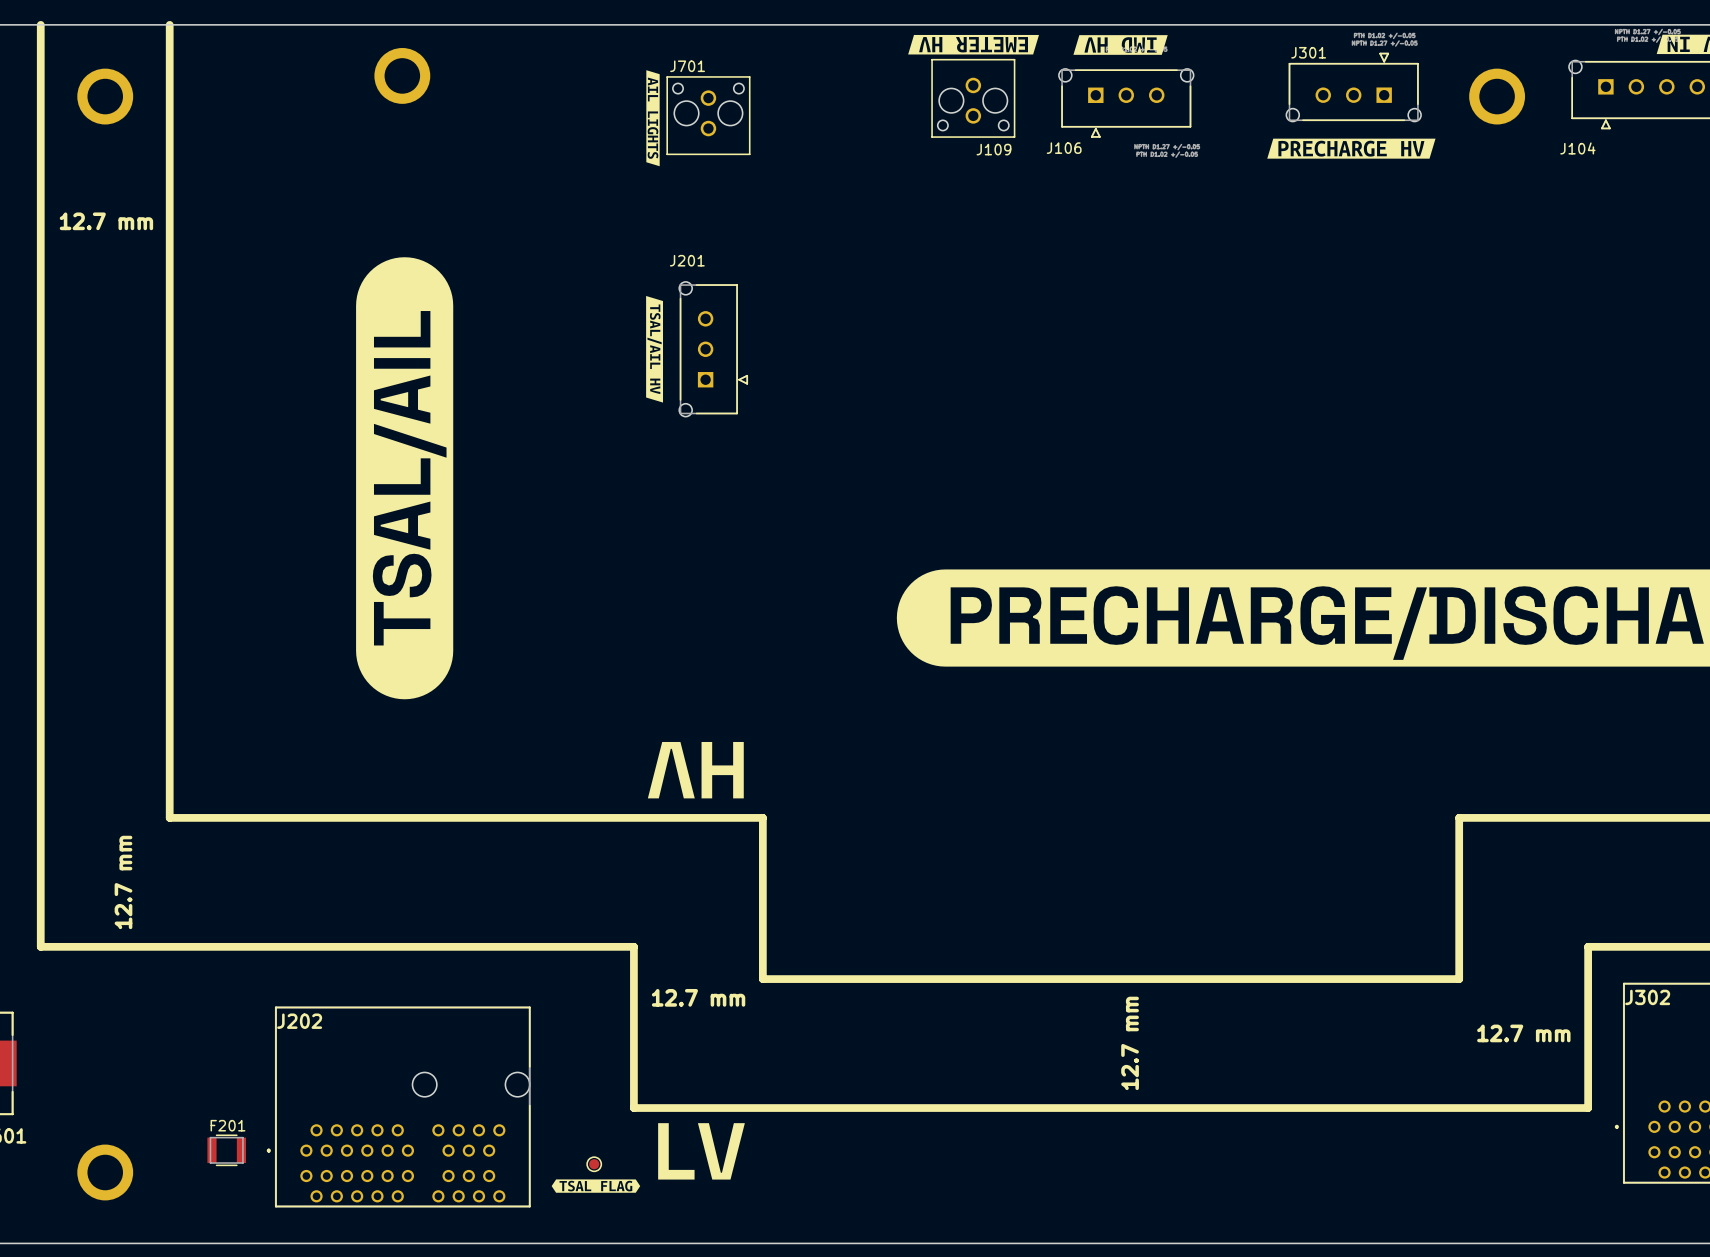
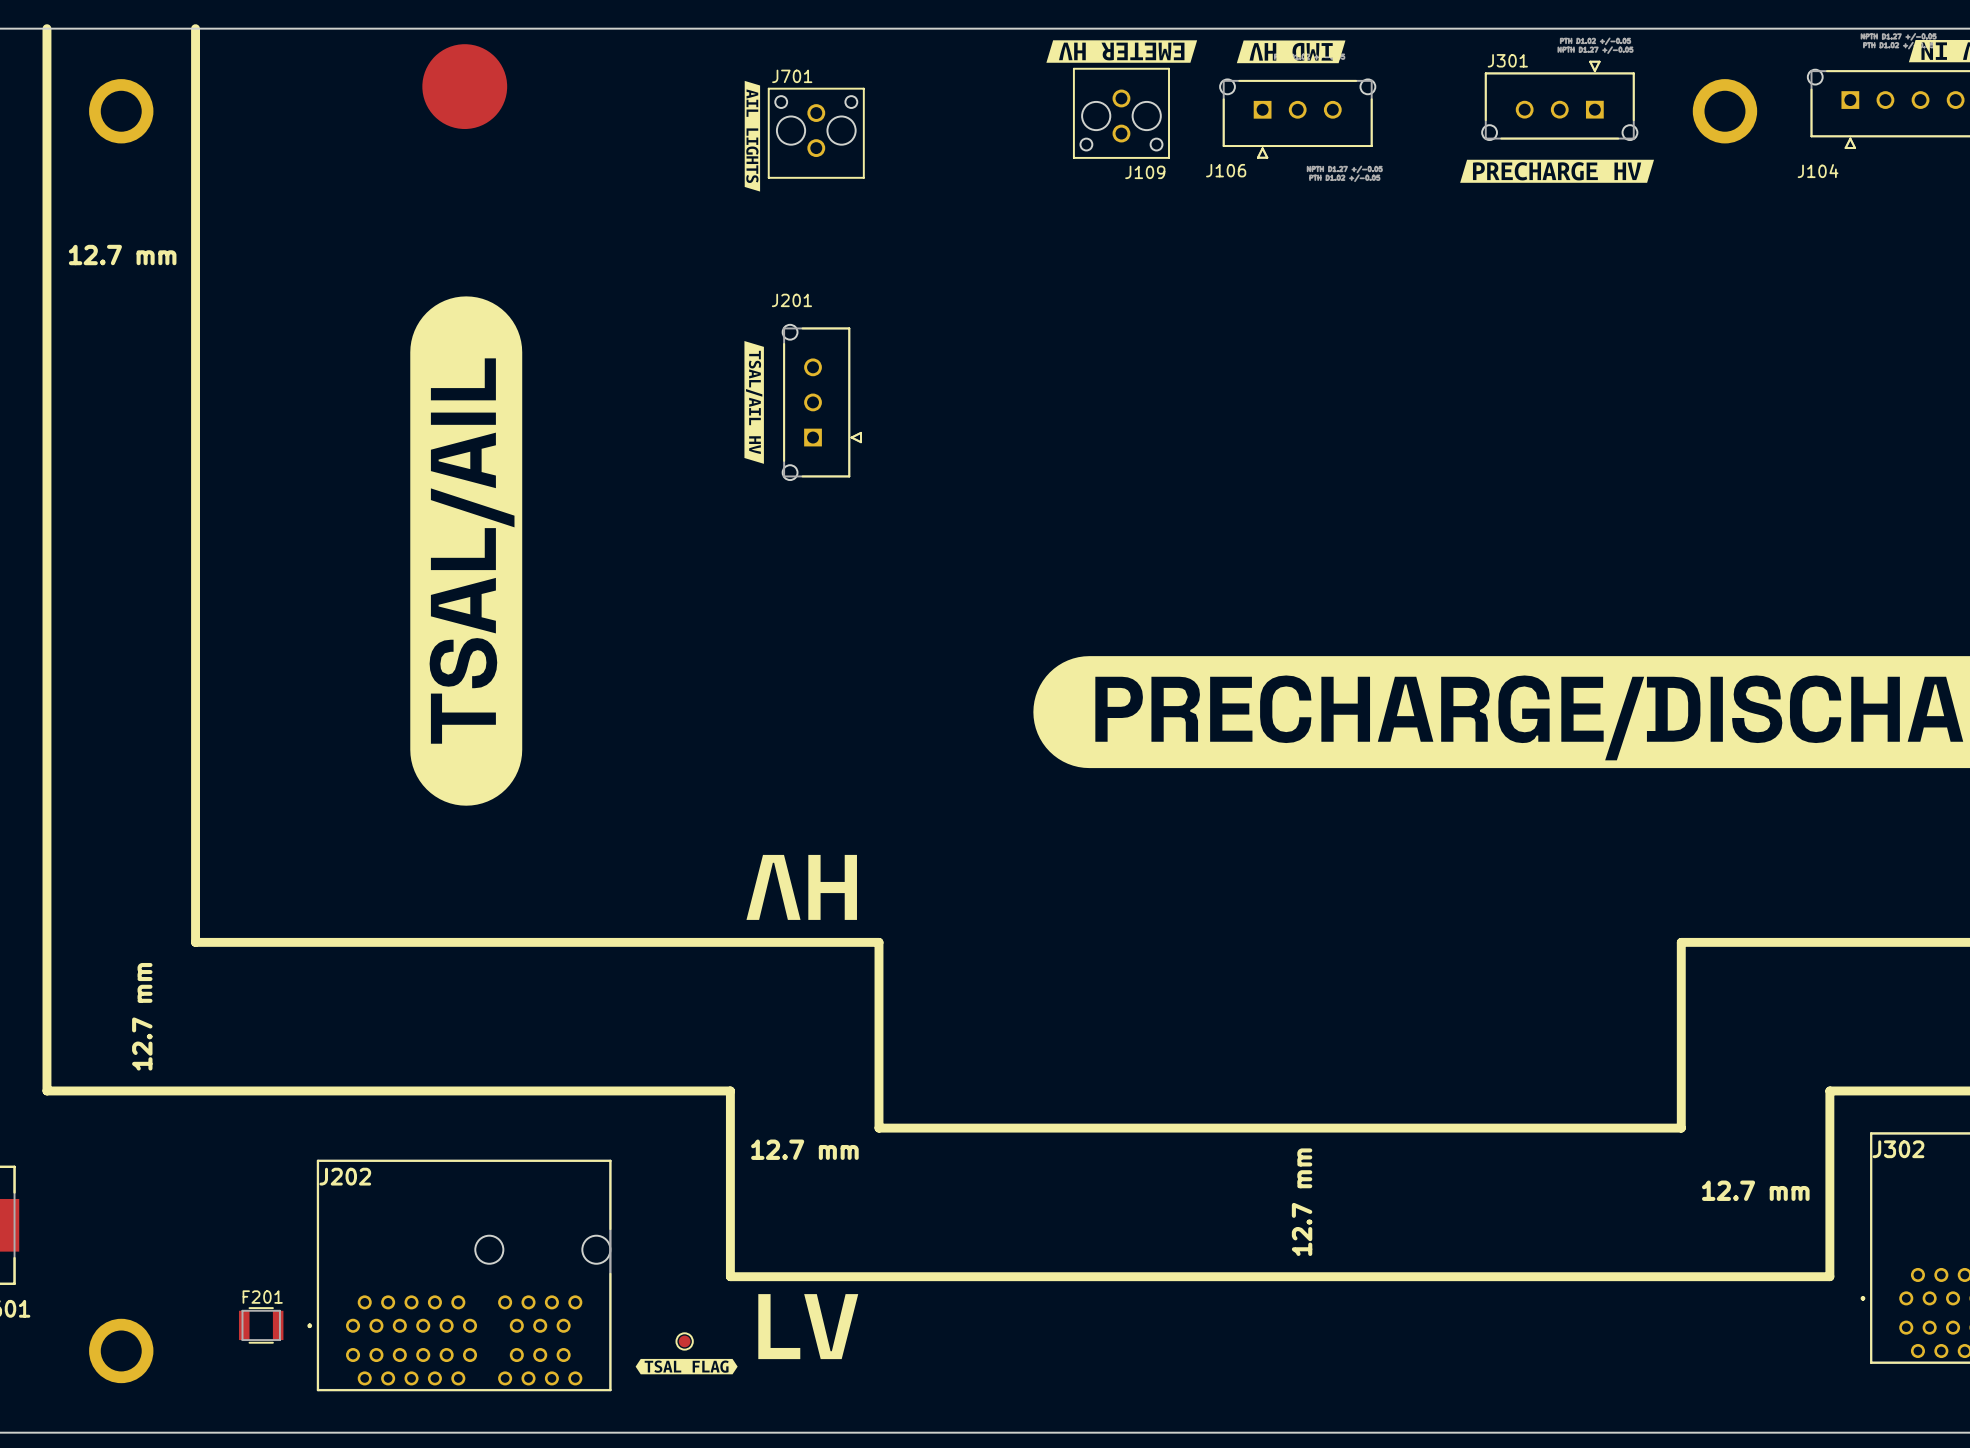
part footprint: [374, 48, 431, 104] -> [422, 44, 508, 130]

